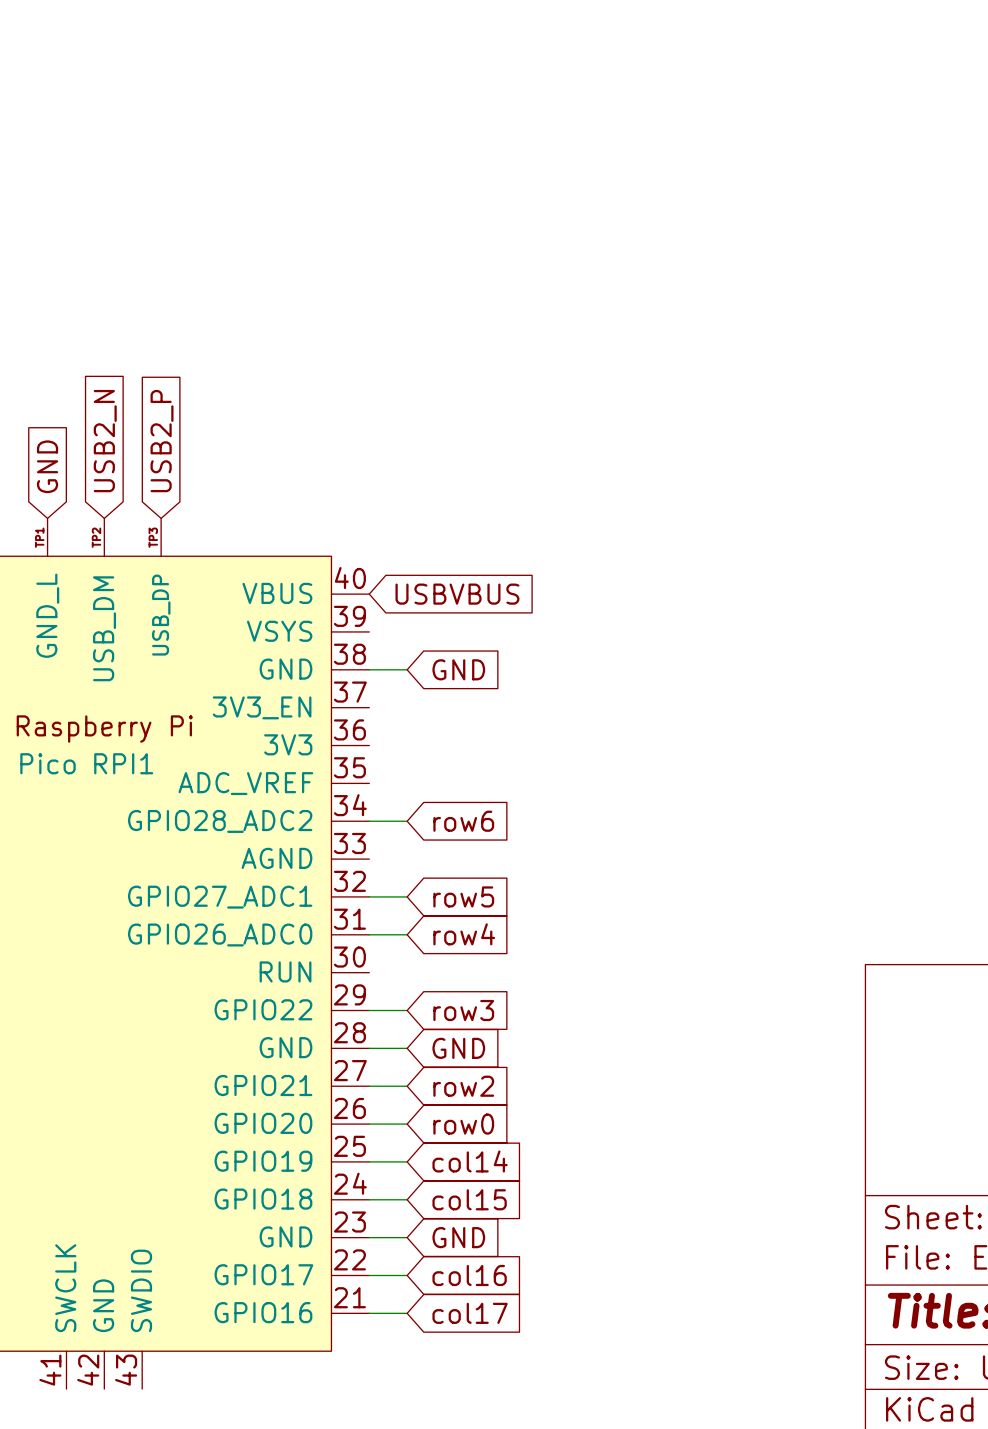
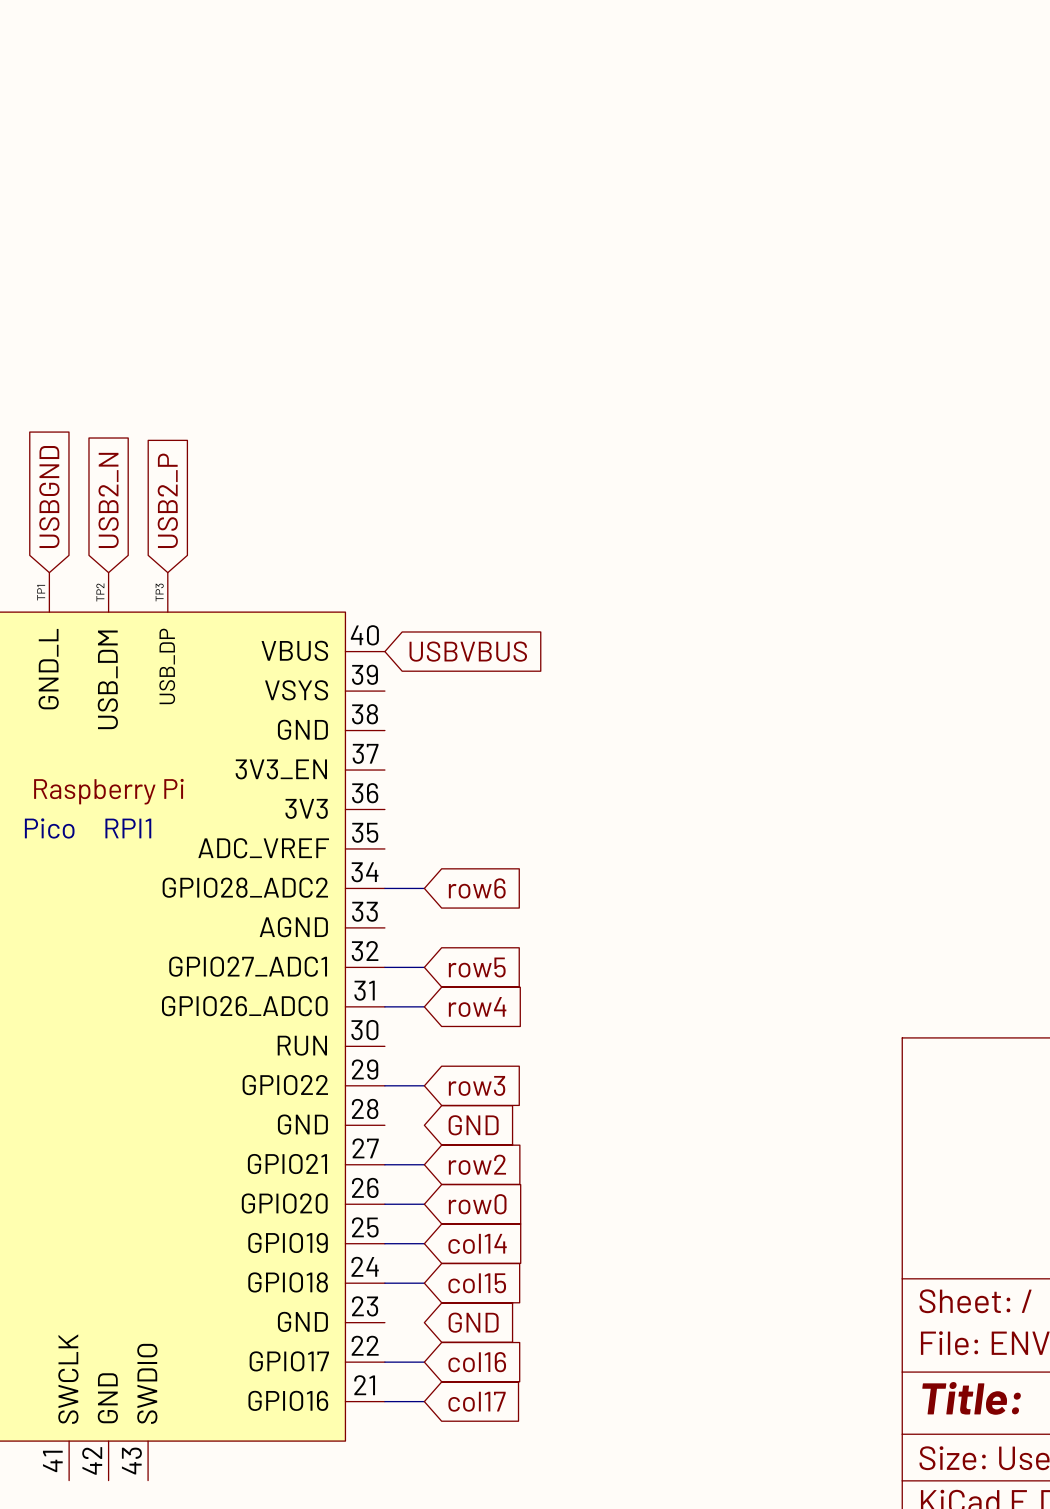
global label: GND (47, 466) -> USBGND (49, 497)
wire: (369, 669) (407, 669) -> none
global label: GND (458, 669) -> none
wire: (369, 1048) (407, 1048) -> none
wire: (369, 1237) (407, 1237) -> none

